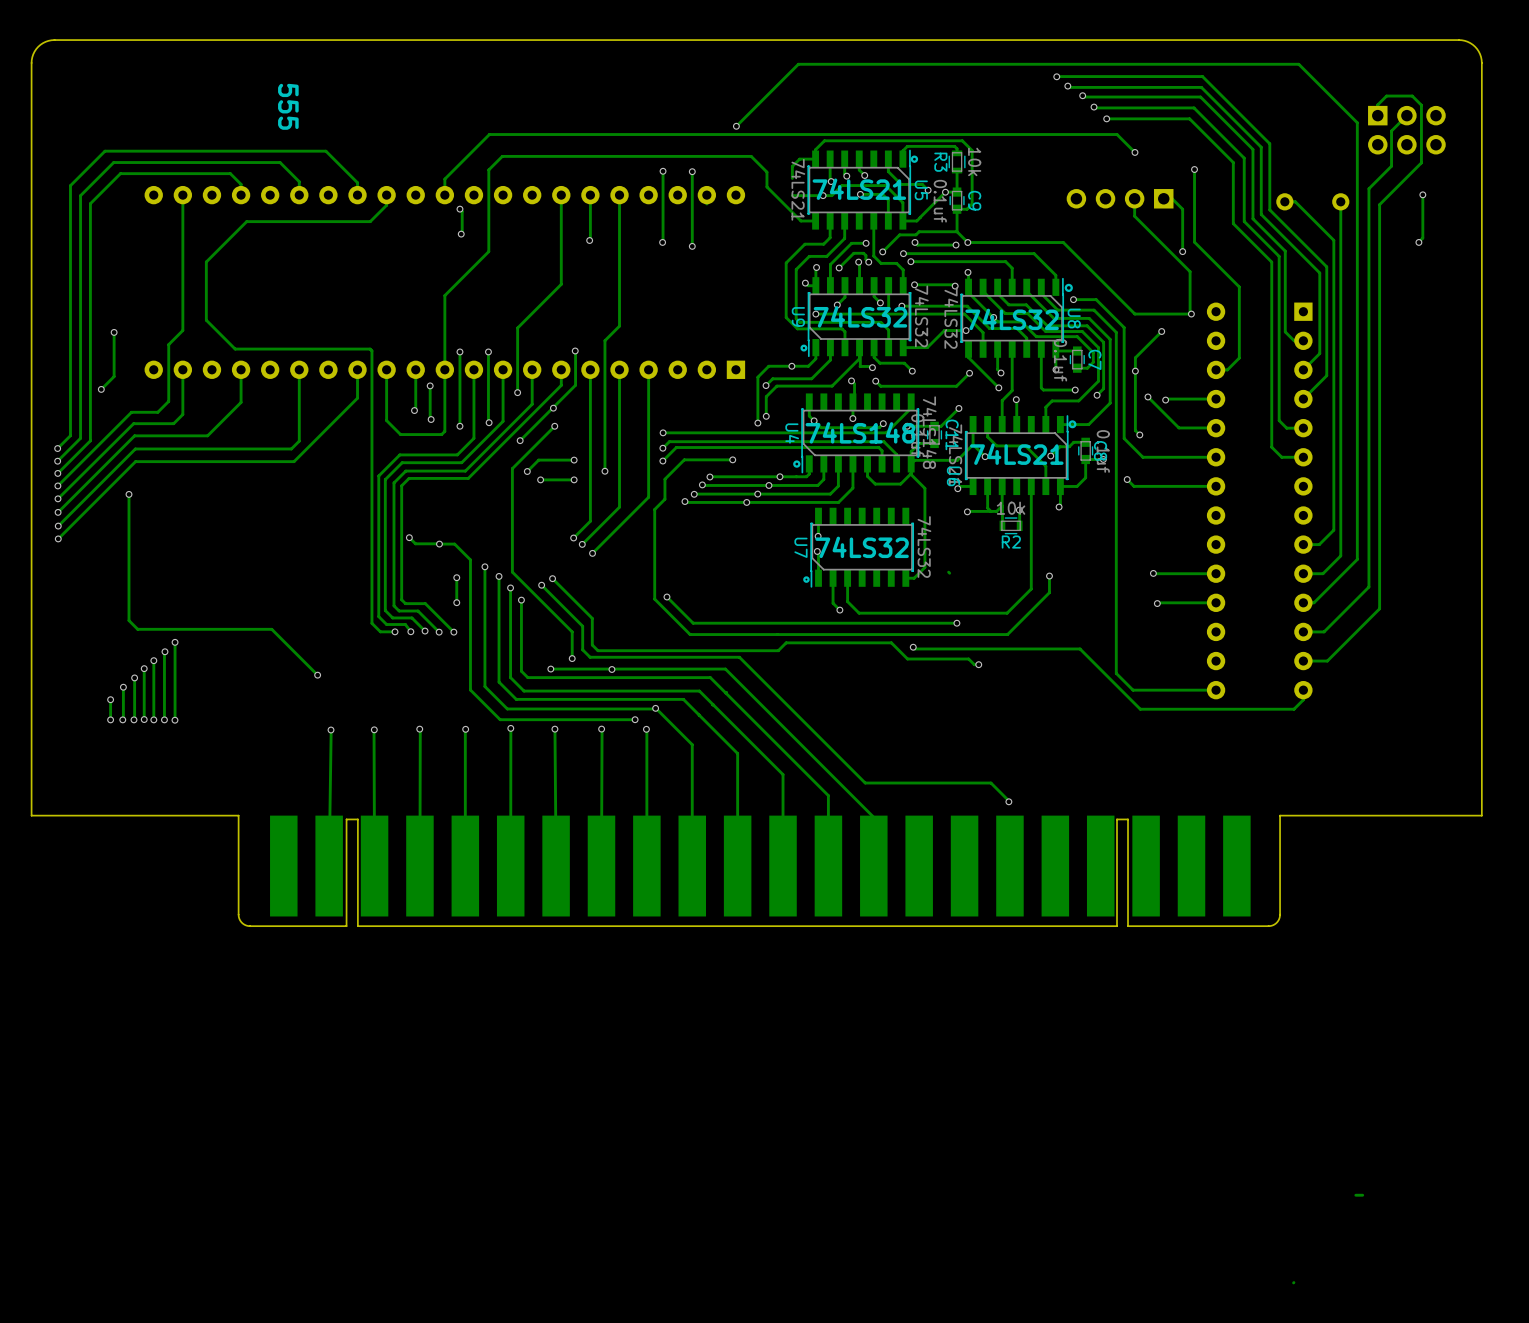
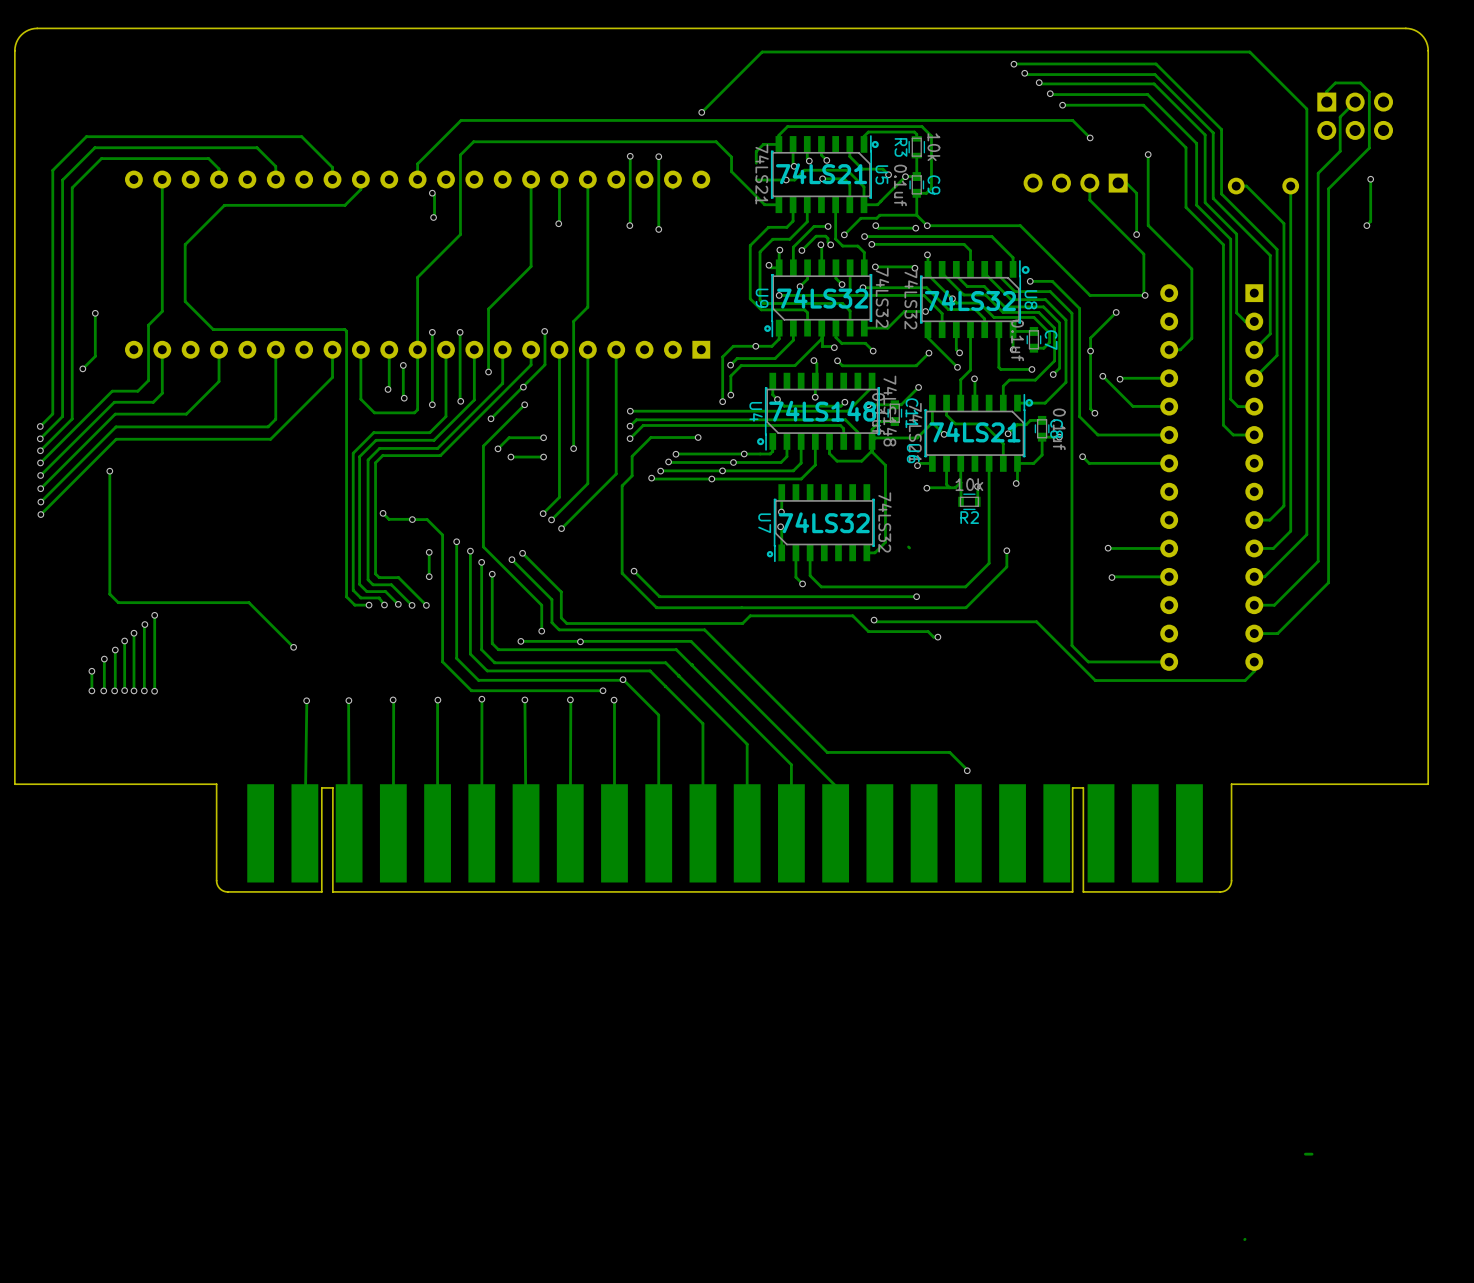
text: 555 (288, 106) -> none

